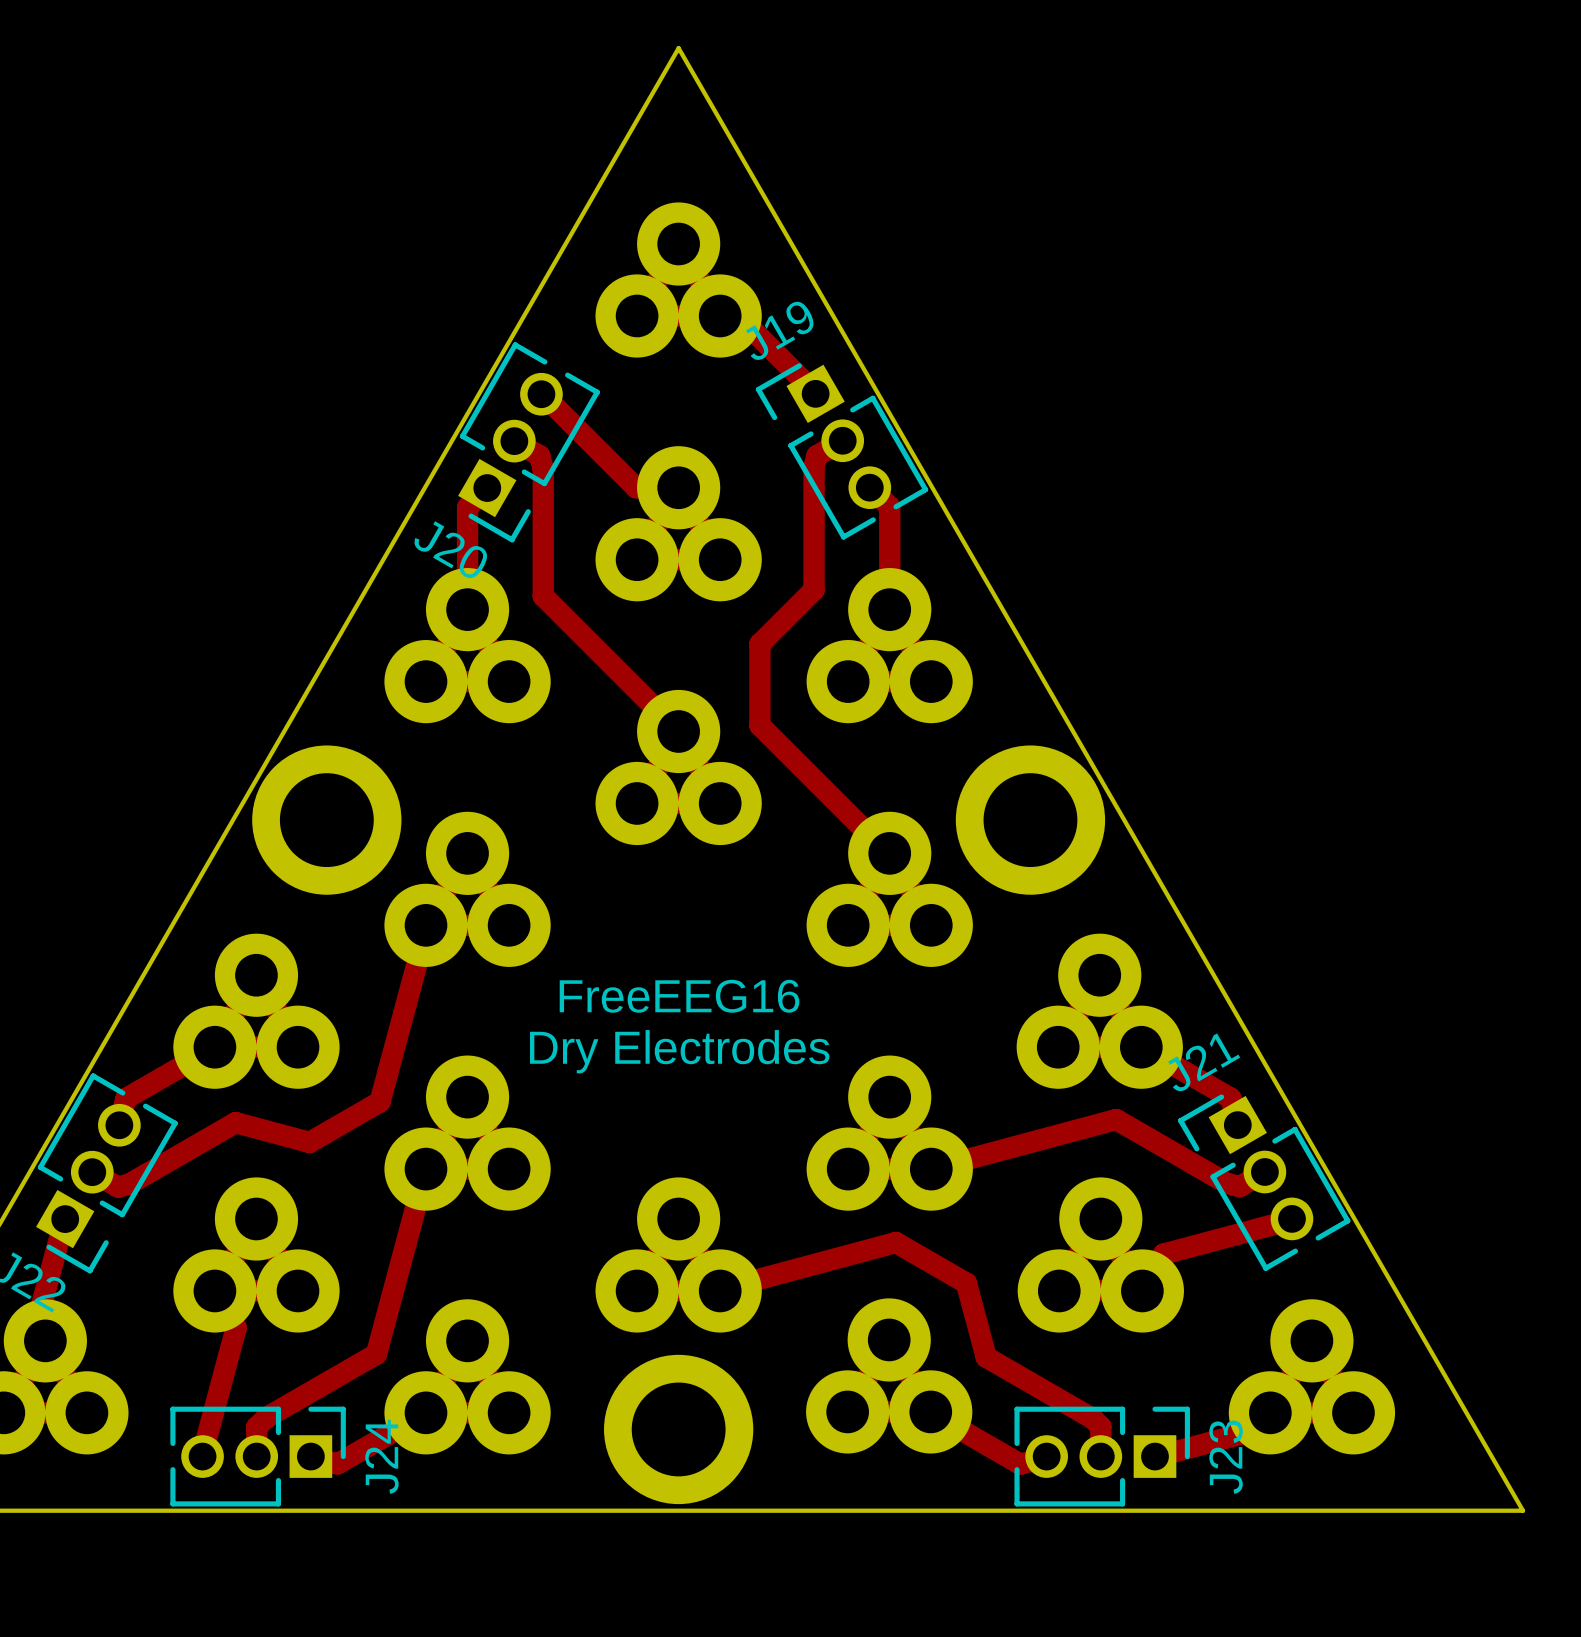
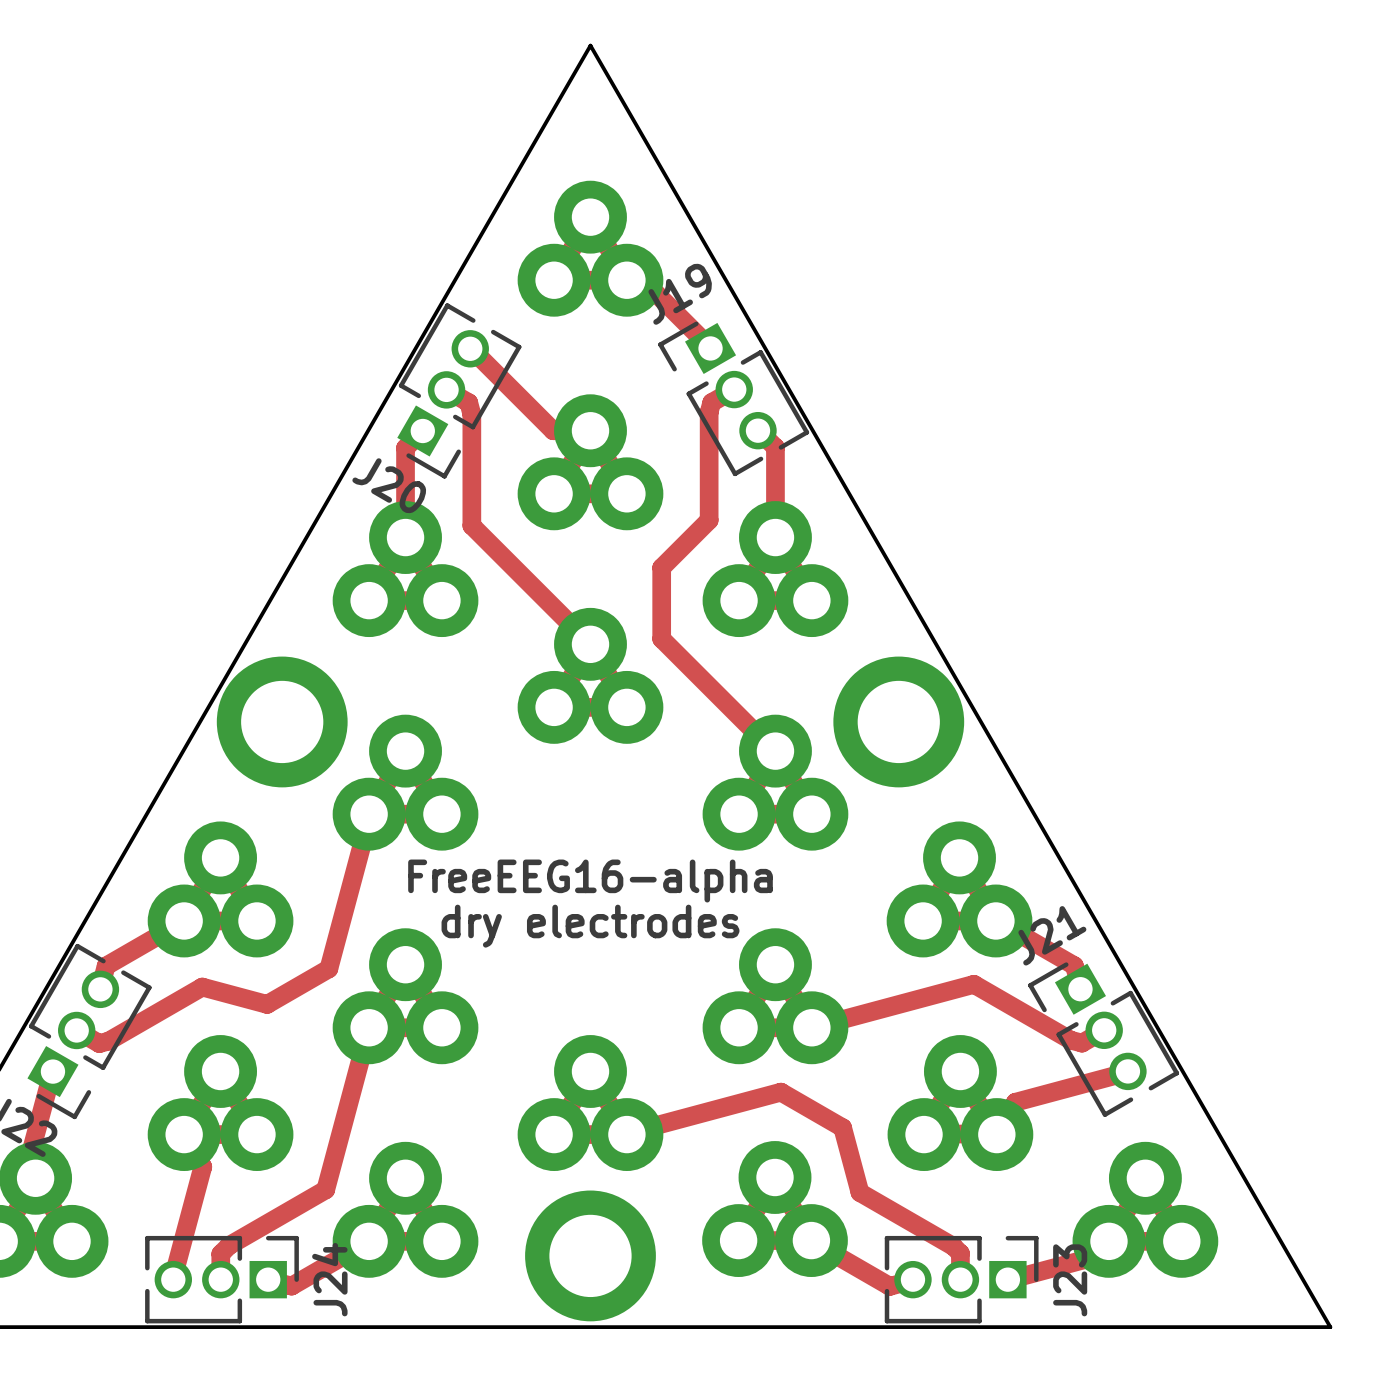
text: FreeEEG16 (679, 996) -> FreeEEG16-alpha (590, 881)
text: Dry Electrodes (679, 1051) -> dry electrodes (590, 926)

